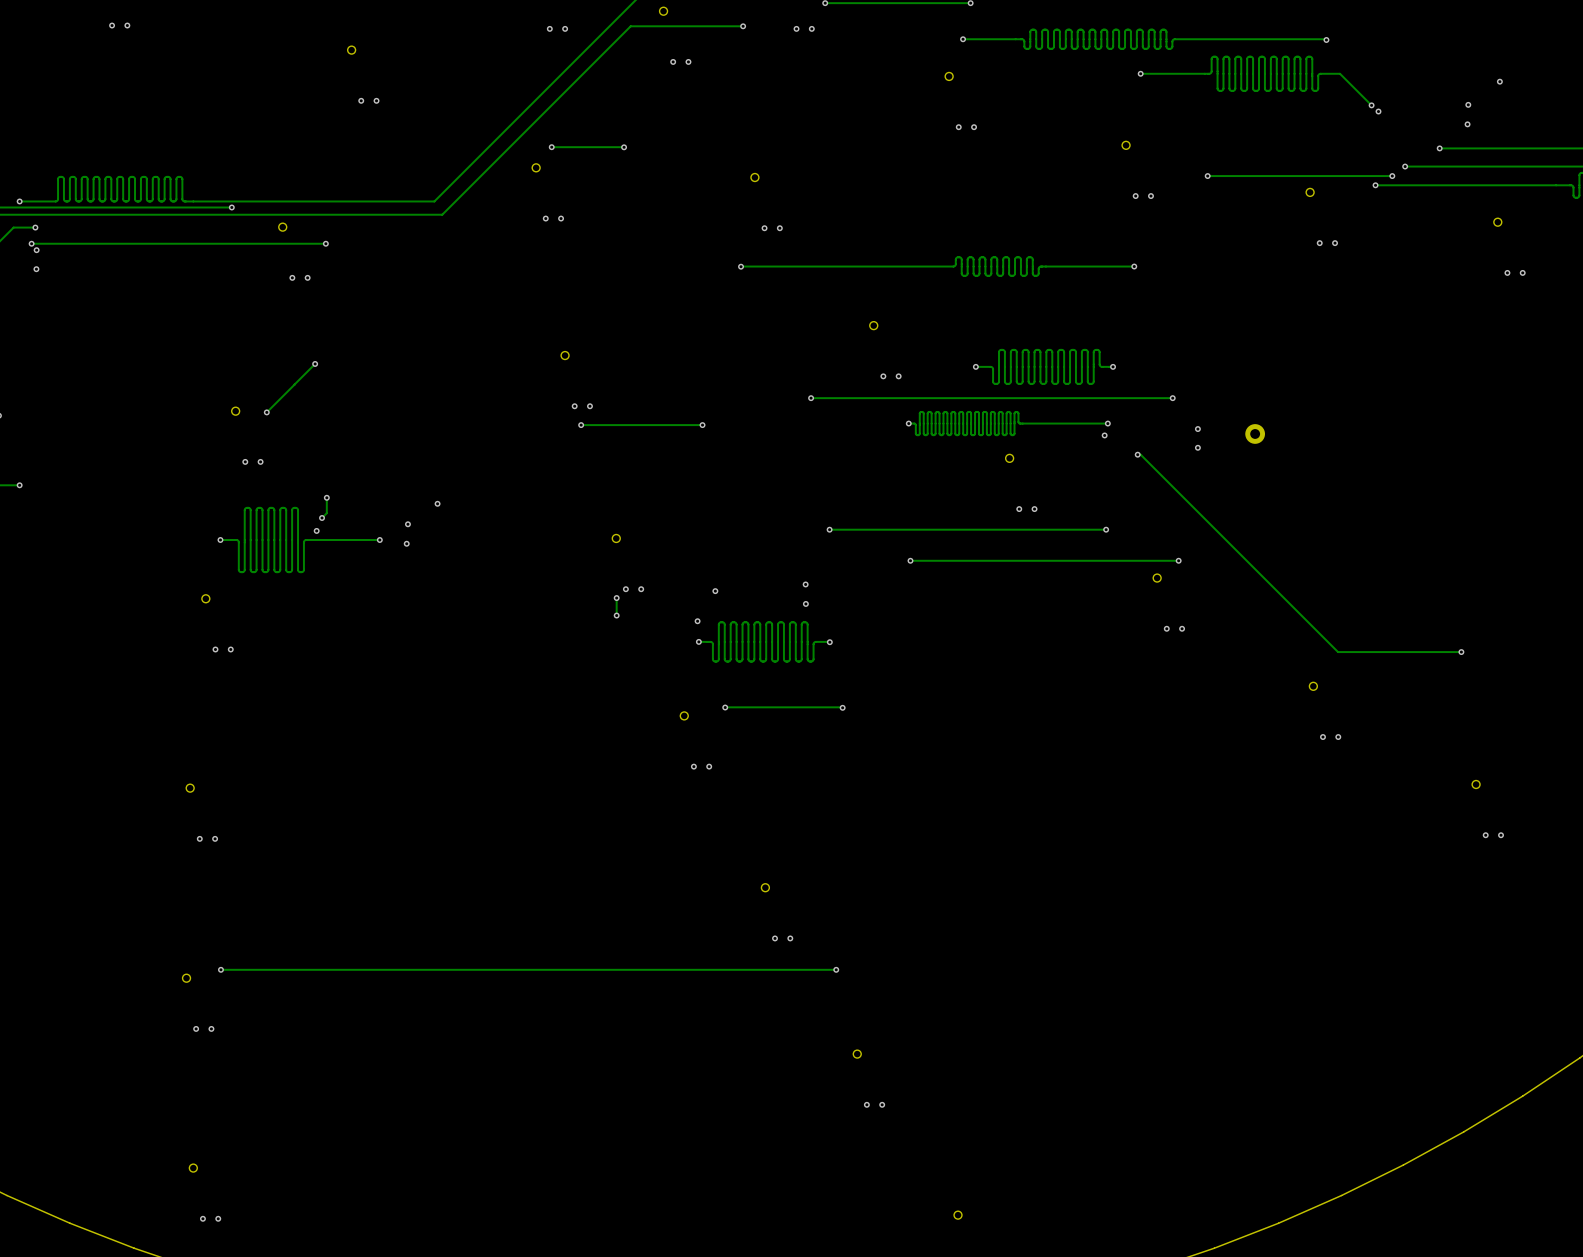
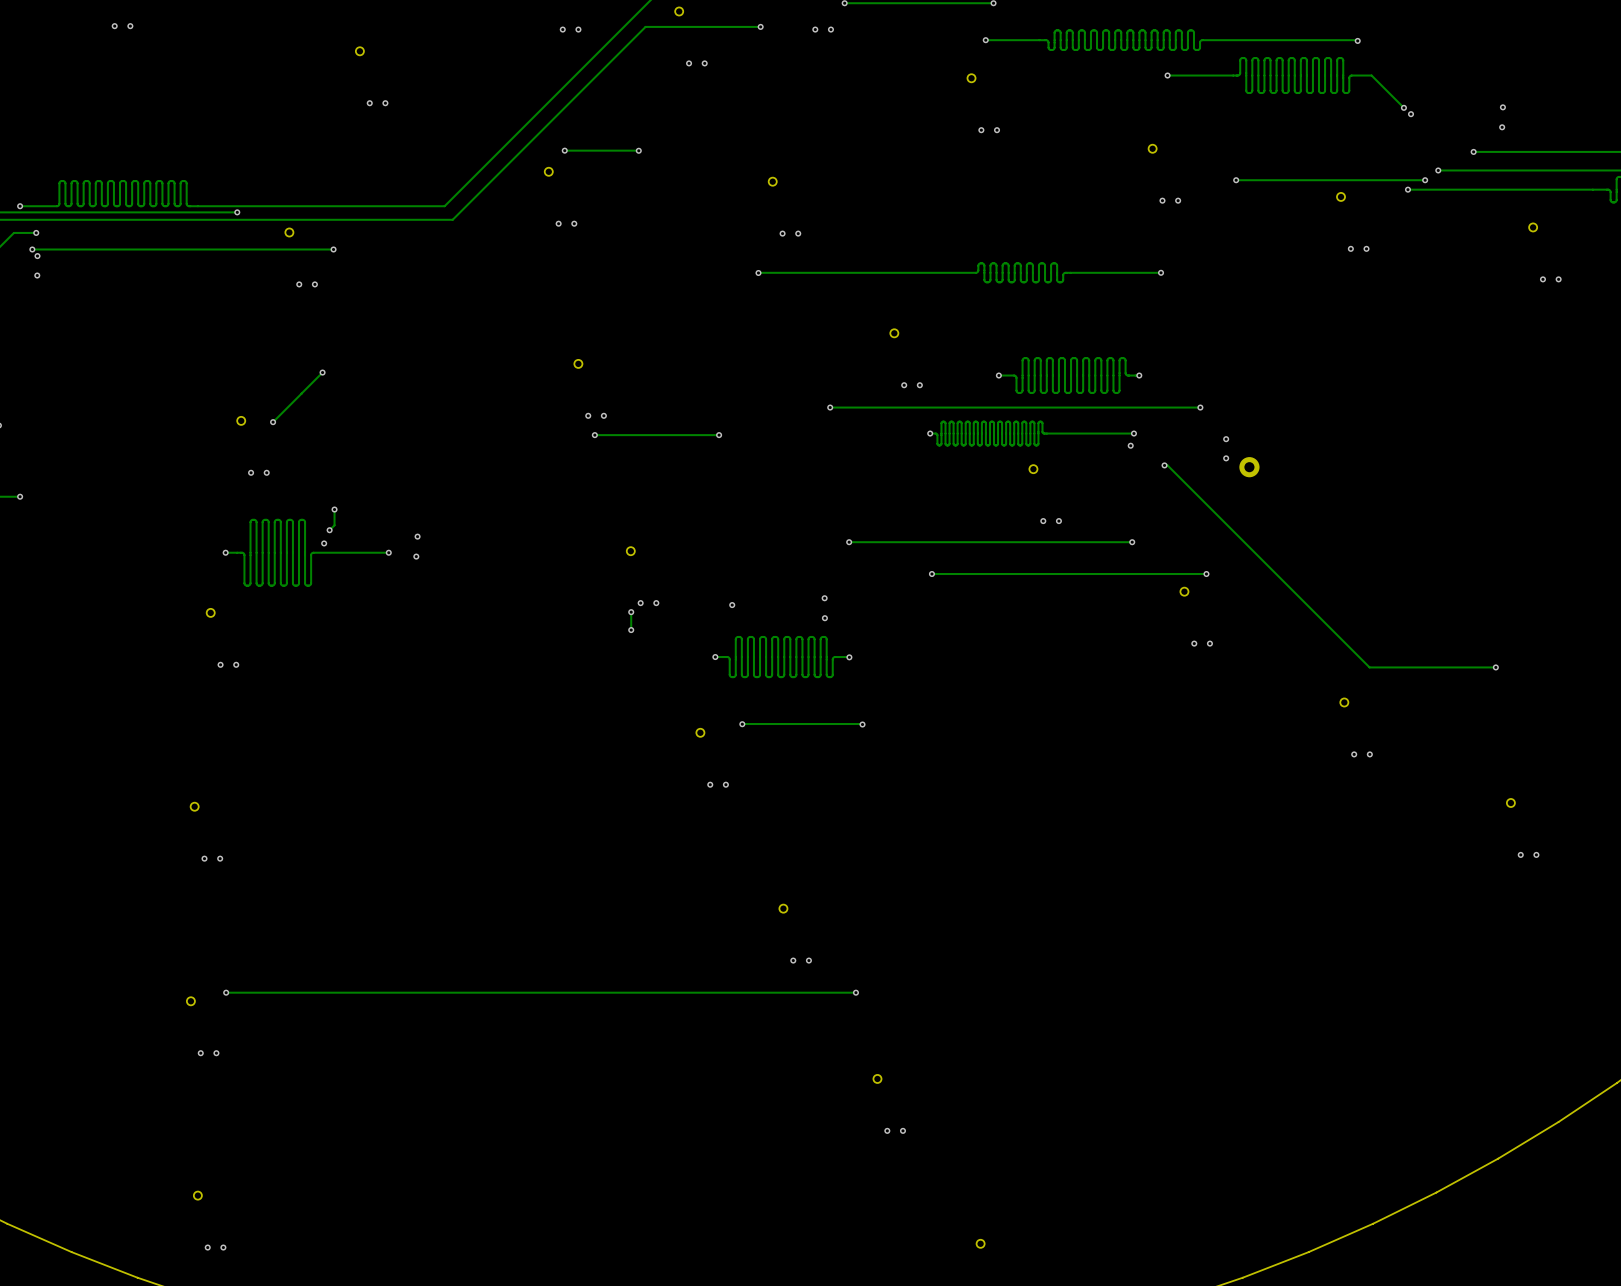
via: (1499, 81) -> none
part position: (1255, 433) -> (1249, 467)
via: (437, 503) -> none
via: (697, 621) -> none

